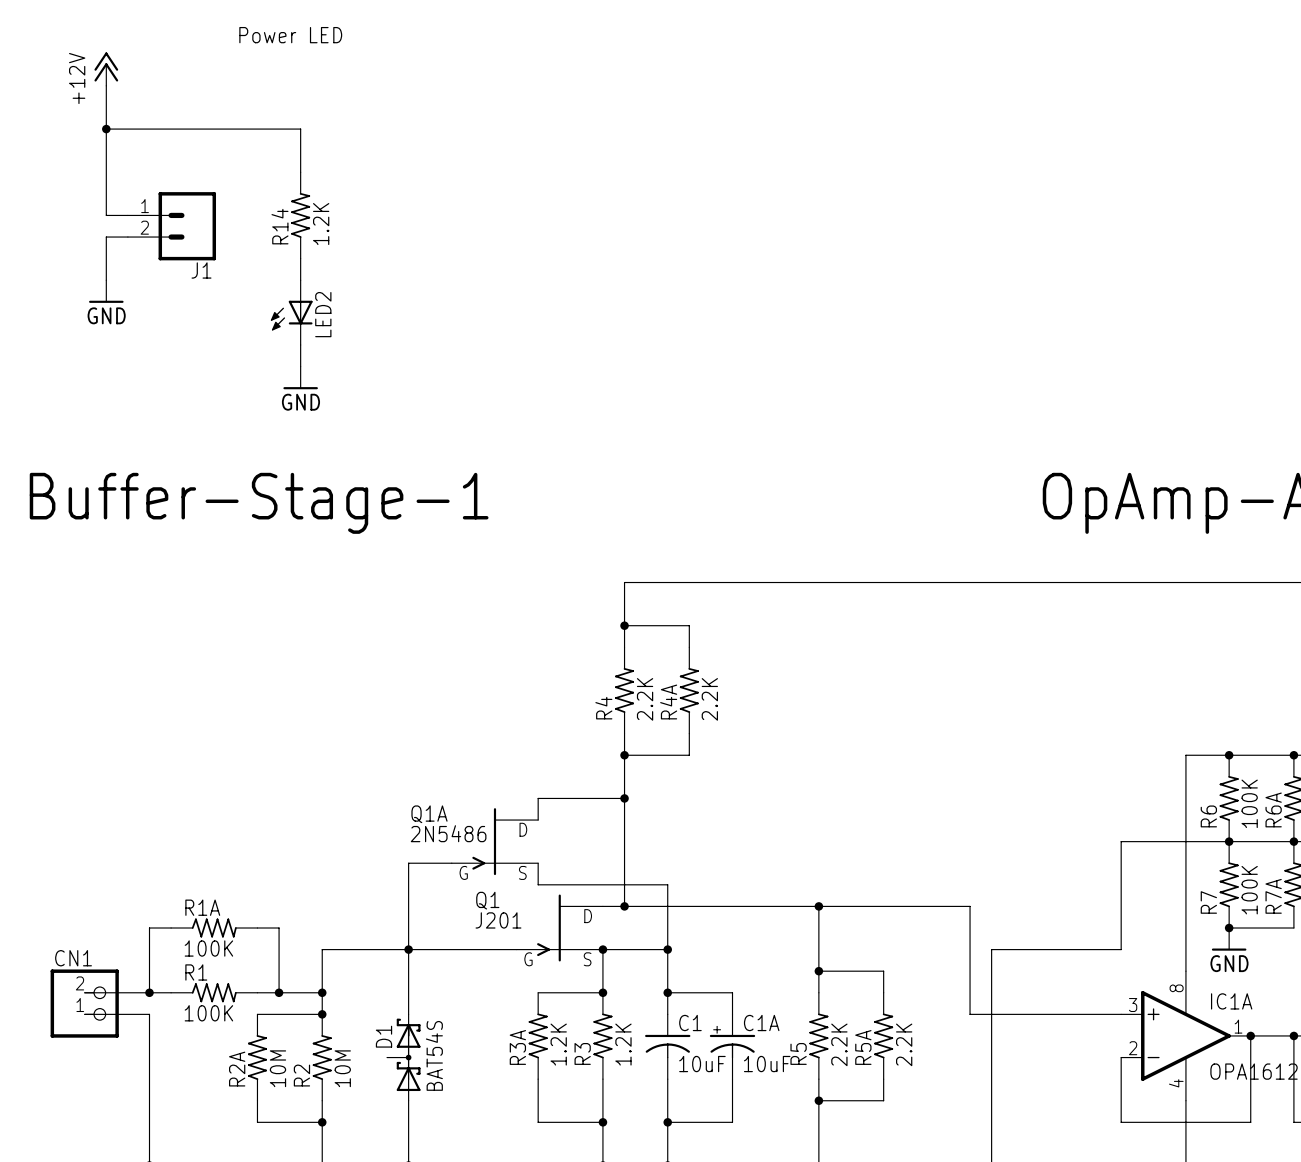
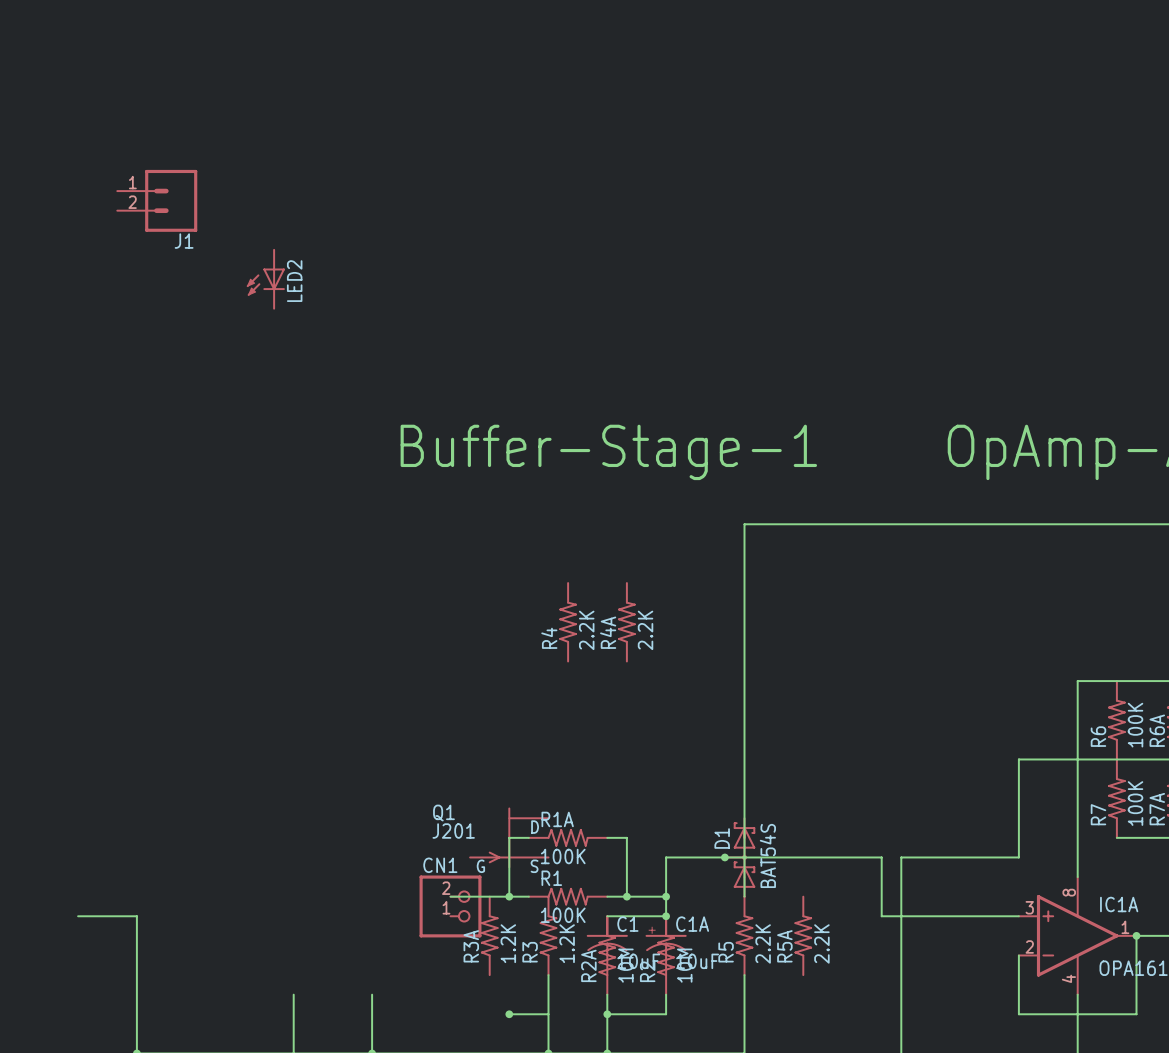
text: Power LED (290, 35) -> none
power symbol: +12V (106, 69) -> none
wire: (106, 85) (106, 215) (127, 215) -> none
wire: (106, 129) (300, 129) (300, 172) -> none
junction: (106, 129) -> none
R14: 1.2K (300, 215) -> none
wire: (127, 237) (106, 237) (106, 280) -> none
wire: (300, 258) (300, 280) -> none
power symbol: GND (106, 291) -> none
wire: (300, 344) (300, 366) -> none
power symbol: GND (300, 377) -> none
text: Buffer-Stage-1 (259, 503) -> none
text: none -> Buffer-Stage-1 (608, 452)
wire: (818, 582) (624, 582) (624, 647) -> (744, 524) (744, 818)
wire: (624, 625) (689, 625) (689, 647) -> none
junction: (624, 625) -> none
wire: (624, 733) (624, 906) -> none
wire: (689, 733) (689, 755) (624, 755) -> none
junction: (624, 755) -> none
junction: (1229, 755) -> none
wire: (624, 798) (538, 798) (538, 820) -> none
junction: (624, 798) -> none
Q1A: 2N5486 (494, 841) -> none
junction: (1229, 841) -> none
wire: (451, 863) (408, 863) (408, 1014) -> none
wire: (538, 863) (538, 884) (667, 884) (667, 1014) -> (666, 916) (607, 916)
wire: (602, 906) (970, 906) (970, 949) -> (666, 896) (666, 857) (881, 857)
junction: (624, 906) -> none
junction: (818, 906) -> none
wire: (171, 928) (149, 928) (149, 992) -> none
R1A position: (214, 928) -> (568, 837)
wire: (257, 928) (279, 928) (279, 992) -> none
wire: none -> (528, 837) (509, 837) (509, 896)
wire: none -> (607, 837) (626, 837) (626, 896)
junction: (1229, 928) -> none
power symbol: GND (1229, 939) -> none
junction: (408, 949) -> none
wire: (516, 949) (322, 949) (322, 1014) (257, 1014) -> none
junction: (602, 949) -> none
wire: (667, 949) (602, 949) (602, 992) (581, 992) -> none
junction: (667, 949) -> none
junction: none -> (724, 857)
wire: (818, 971) (883, 971) (883, 992) -> none
junction: (818, 971) -> none
wire: (84, 992) (171, 992) -> none
junction: (149, 992) -> none
R1 position: (214, 992) -> (568, 896)
wire: (257, 992) (322, 992) -> none
junction: (279, 992) -> none
junction: (322, 992) -> none
wire: none -> (450, 896) (489, 896)
junction: none -> (509, 896)
junction: (602, 992) -> none
junction position: (667, 992) -> (626, 896)
junction: none -> (666, 896)
CN1 position: (84, 1003) -> (450, 906)
junction: (322, 1014) -> none
junction: none -> (666, 916)
R2A position: (257, 1057) -> (607, 955)
R2 position: (322, 1057) -> (666, 955)
D1 position: (403, 1057) -> (740, 857)
wire: (538, 1079) (538, 1122) (559, 1122) -> none
wire: (883, 1079) (883, 1100) (818, 1100) -> none
wire: (257, 1100) (257, 1122) (322, 1122) -> none
junction: (818, 1100) -> none
junction: (322, 1122) -> none
junction position: (602, 1122) -> (509, 1014)

